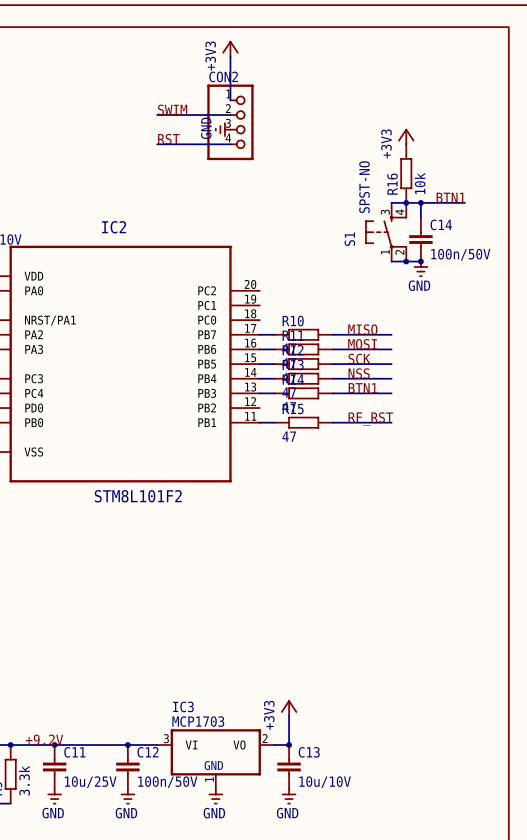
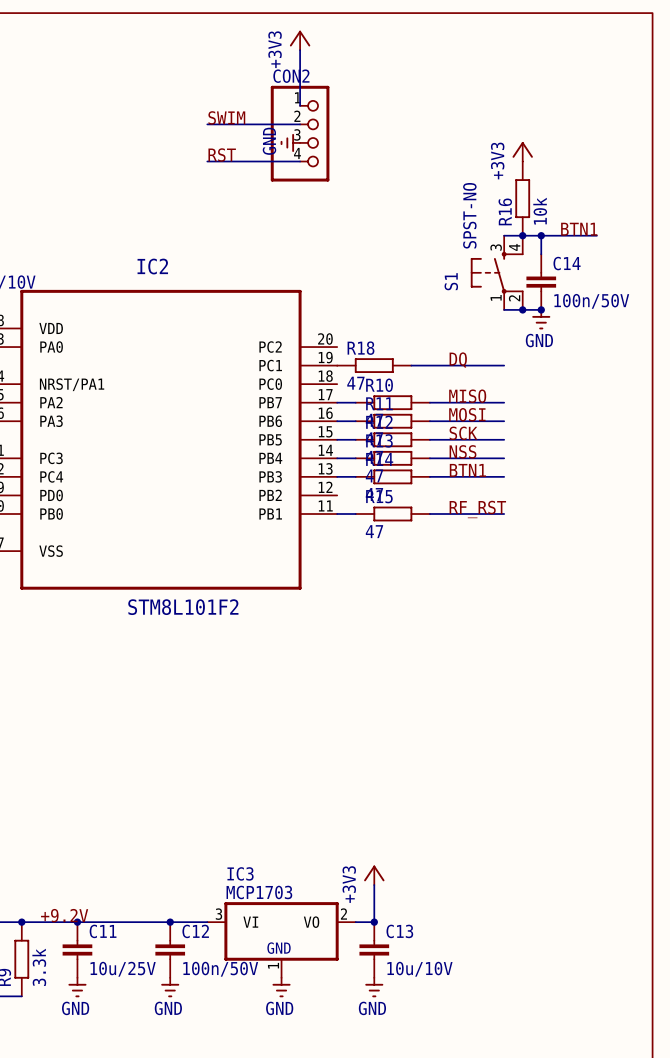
label: none -> DQ (458, 360)
R18: none -> 47 (374, 365)
wire: none -> (411, 365) (504, 365)

